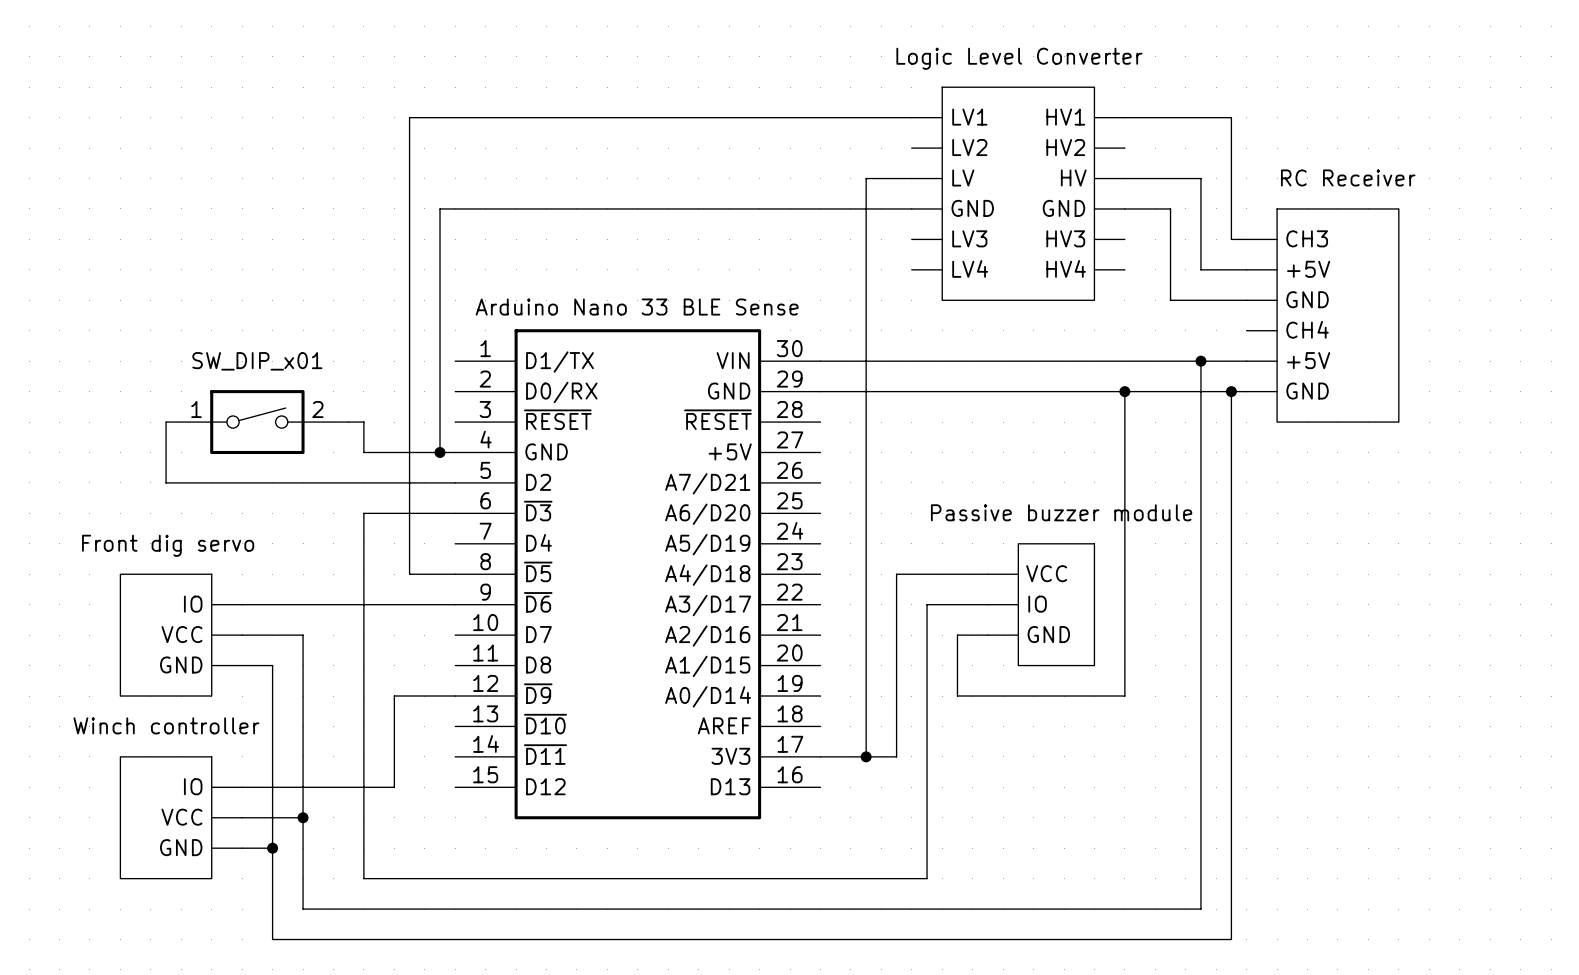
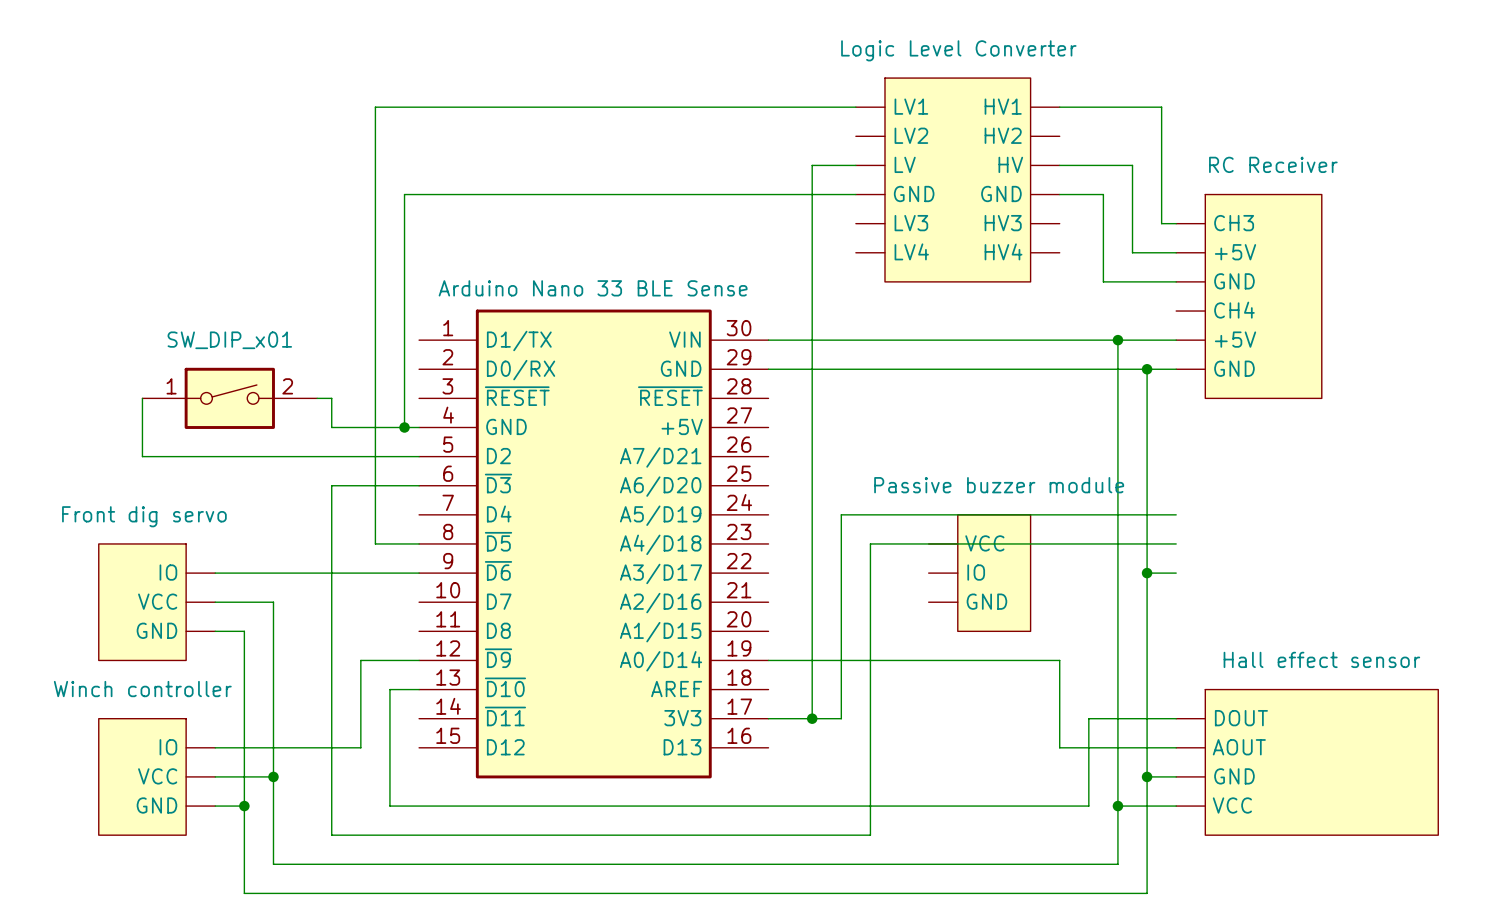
wire: (1200, 361) (1200, 909) (1185, 909) -> (1117, 340) (1117, 864)
junction position: (1200, 361) -> (1117, 340)
wire: (1124, 391) (1124, 696) -> (1176, 747) (1059, 747) (1059, 660)
junction: (1124, 391) -> none
wire: (1231, 391) (1231, 939) (1216, 939) -> (1147, 369) (1147, 893)
junction position: (1231, 391) -> (1147, 369)
wire: none -> (1176, 514) (841, 514) (841, 543)
wire: (896, 574) (927, 574) -> (870, 573) (870, 543)
wire: none -> (928, 543) (1176, 543)
wire: (927, 604) (987, 604) -> none
wire: none -> (1147, 573) (1176, 573)
junction: none -> (1147, 573)
wire: (987, 635) (957, 635) (957, 696) -> (768, 660) (899, 660)
wire: none -> (419, 689) (389, 689) (389, 806) (1088, 806) (1088, 718) (1176, 718)
part: none -> Hall effect sensor (1307, 762)
wire: none -> (1147, 776) (1176, 776)
junction: none -> (1147, 776)
wire: none -> (1117, 806) (1176, 806)
junction: none -> (1117, 806)

